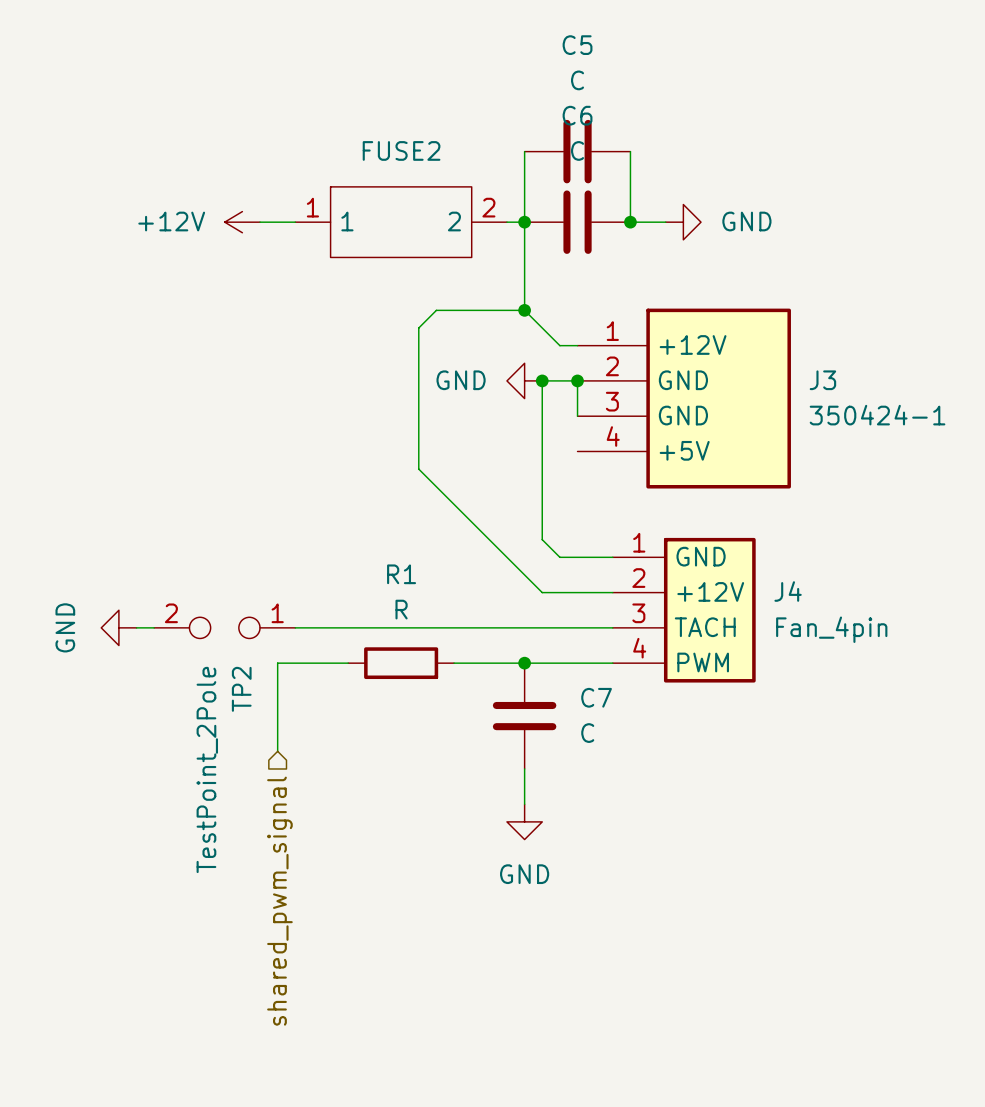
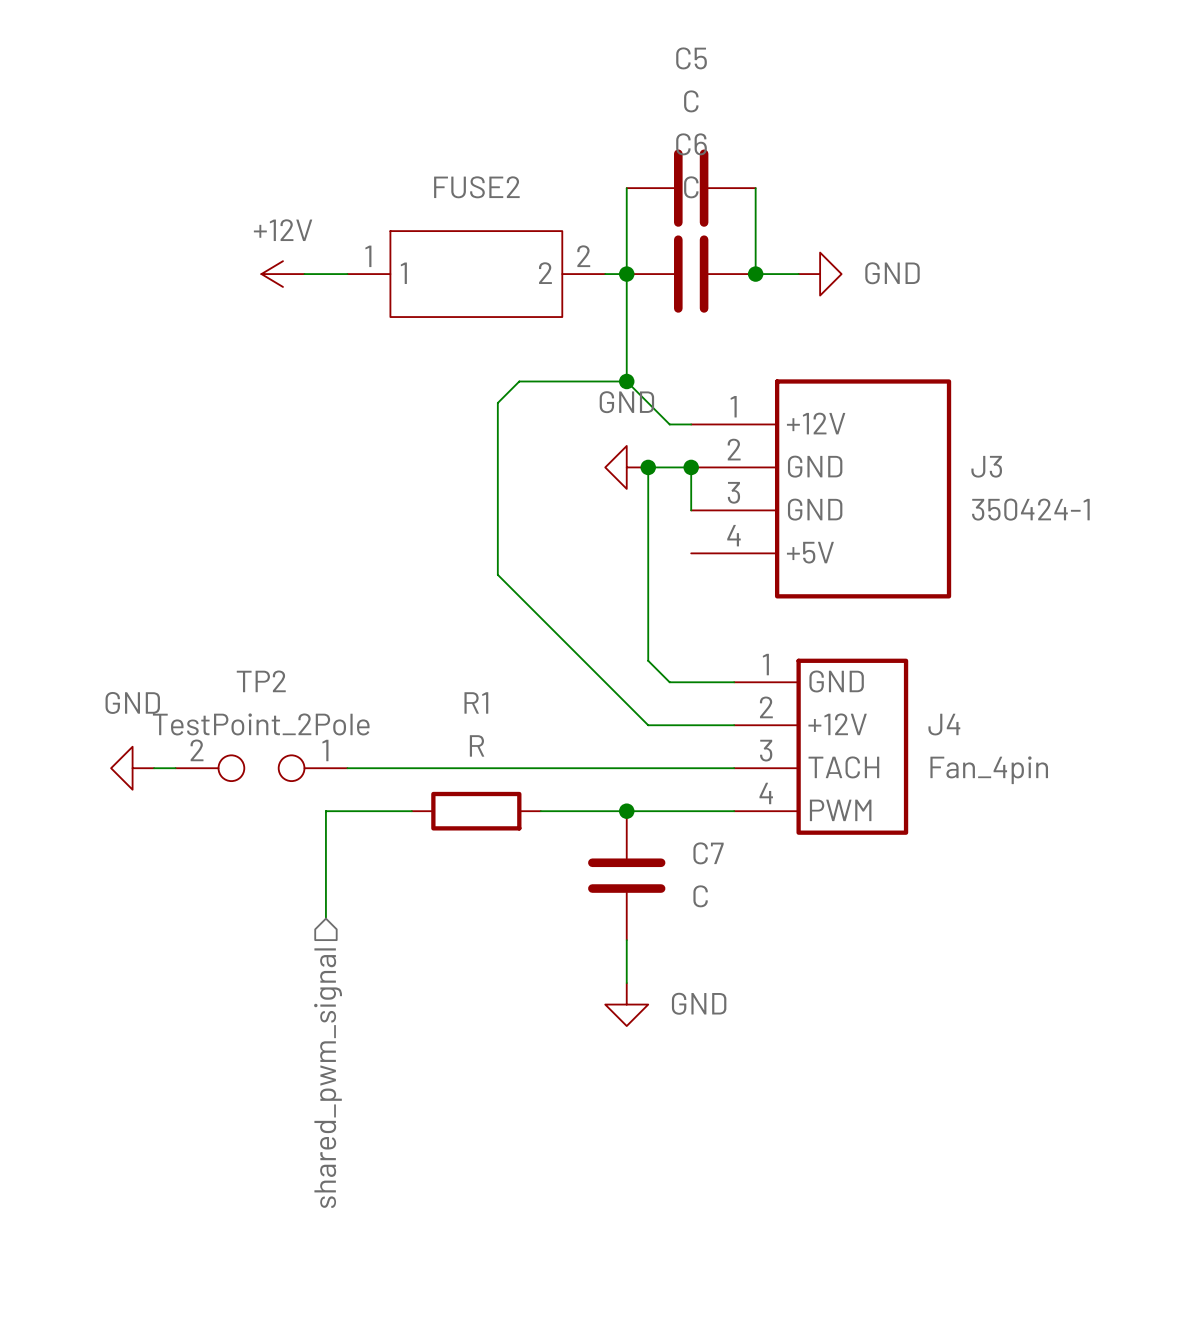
power symbol text position: +12V (171, 221) -> +12V (283, 230)
power symbol text position: GND (461, 380) -> GND (626, 402)
power symbol text rotation: 0° (65, 627) -> 90° clockwise (132, 702)
power symbol text position: GND (65, 627) -> GND (132, 702)
TP2 name rotation: 0° (241, 689) -> 90° clockwise (261, 681)
TP2 name position: TP2 (241, 689) -> TP2 (261, 681)
TP2 value rotation: 0° (207, 769) -> 90° clockwise (261, 724)
power symbol text position: GND (524, 874) -> GND (699, 1003)

